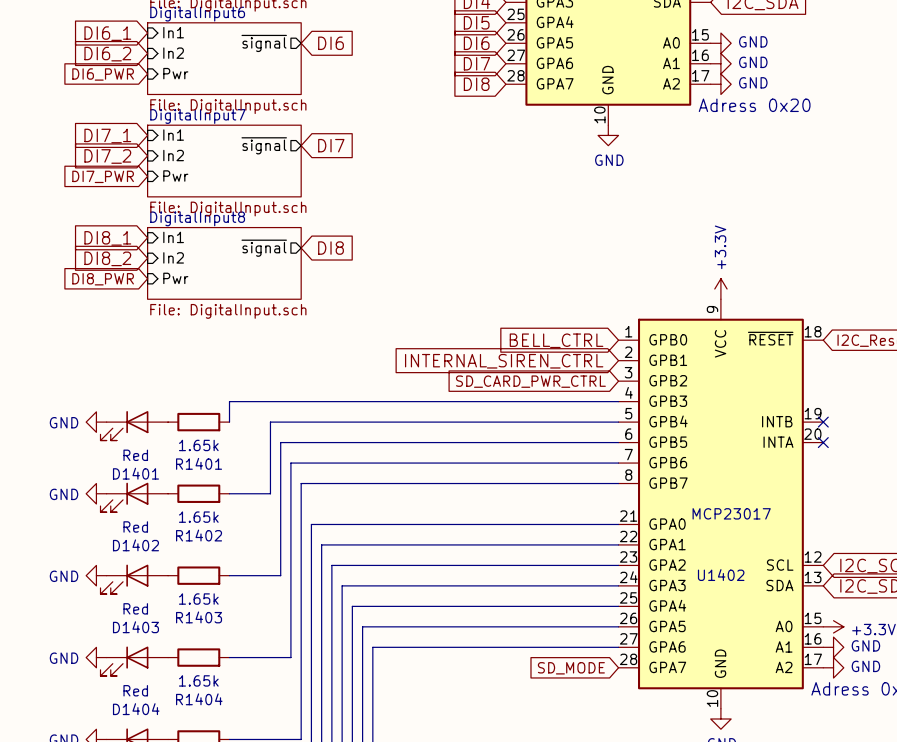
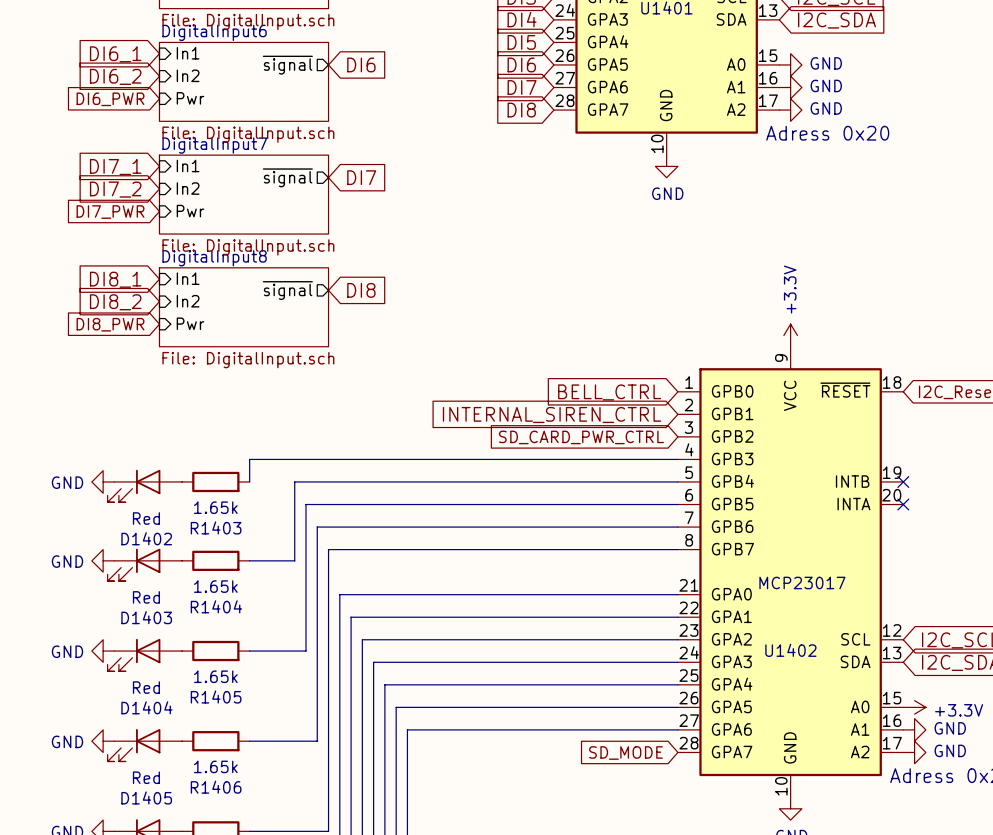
R1401 name: R1401 (199, 463) -> R1403 (216, 527)
D1401 name: D1401 (135, 473) -> D1402 (146, 538)
R1402 name: R1402 (199, 535) -> R1404 (216, 606)
D1402 name: D1402 (135, 545) -> D1403 (146, 617)
R1403 name: R1403 (199, 617) -> R1405 (216, 697)
D1403 name: D1403 (135, 627) -> D1404 (146, 707)
R1404 name: R1404 (199, 699) -> R1406 (216, 787)
D1404 name: D1404 (136, 709) -> D1405 (146, 797)

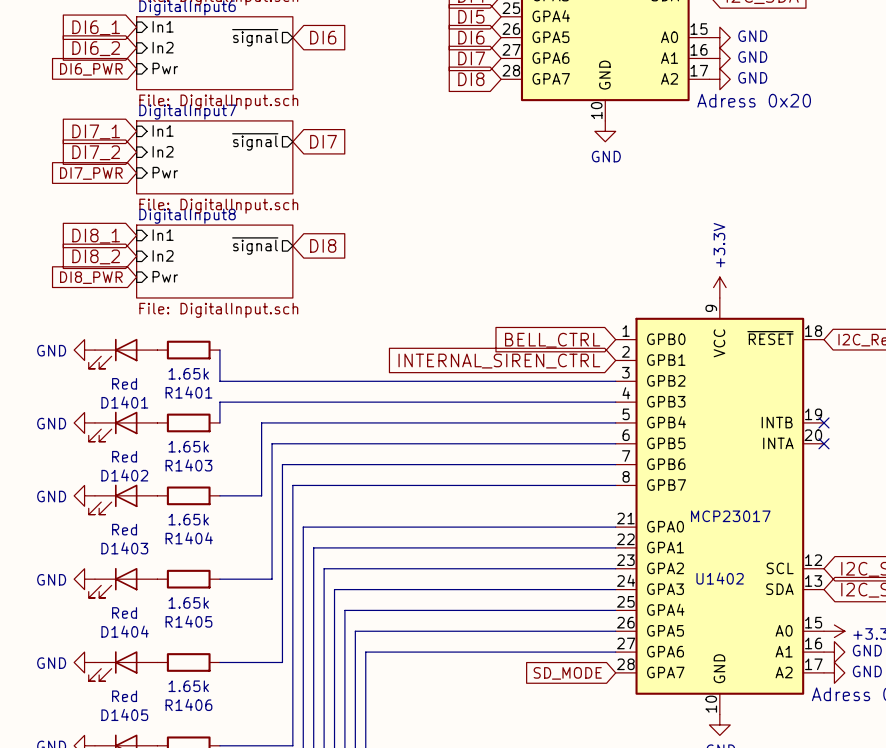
power symbol: none -> GND (84, 350)
R1401: none -> 1.65k (188, 350)
wire: none -> (219, 350) (219, 381) (615, 381)
D1401: none -> Red (123, 353)
global label: SD_CARD_PWR_CTRL (581, 437) -> none

